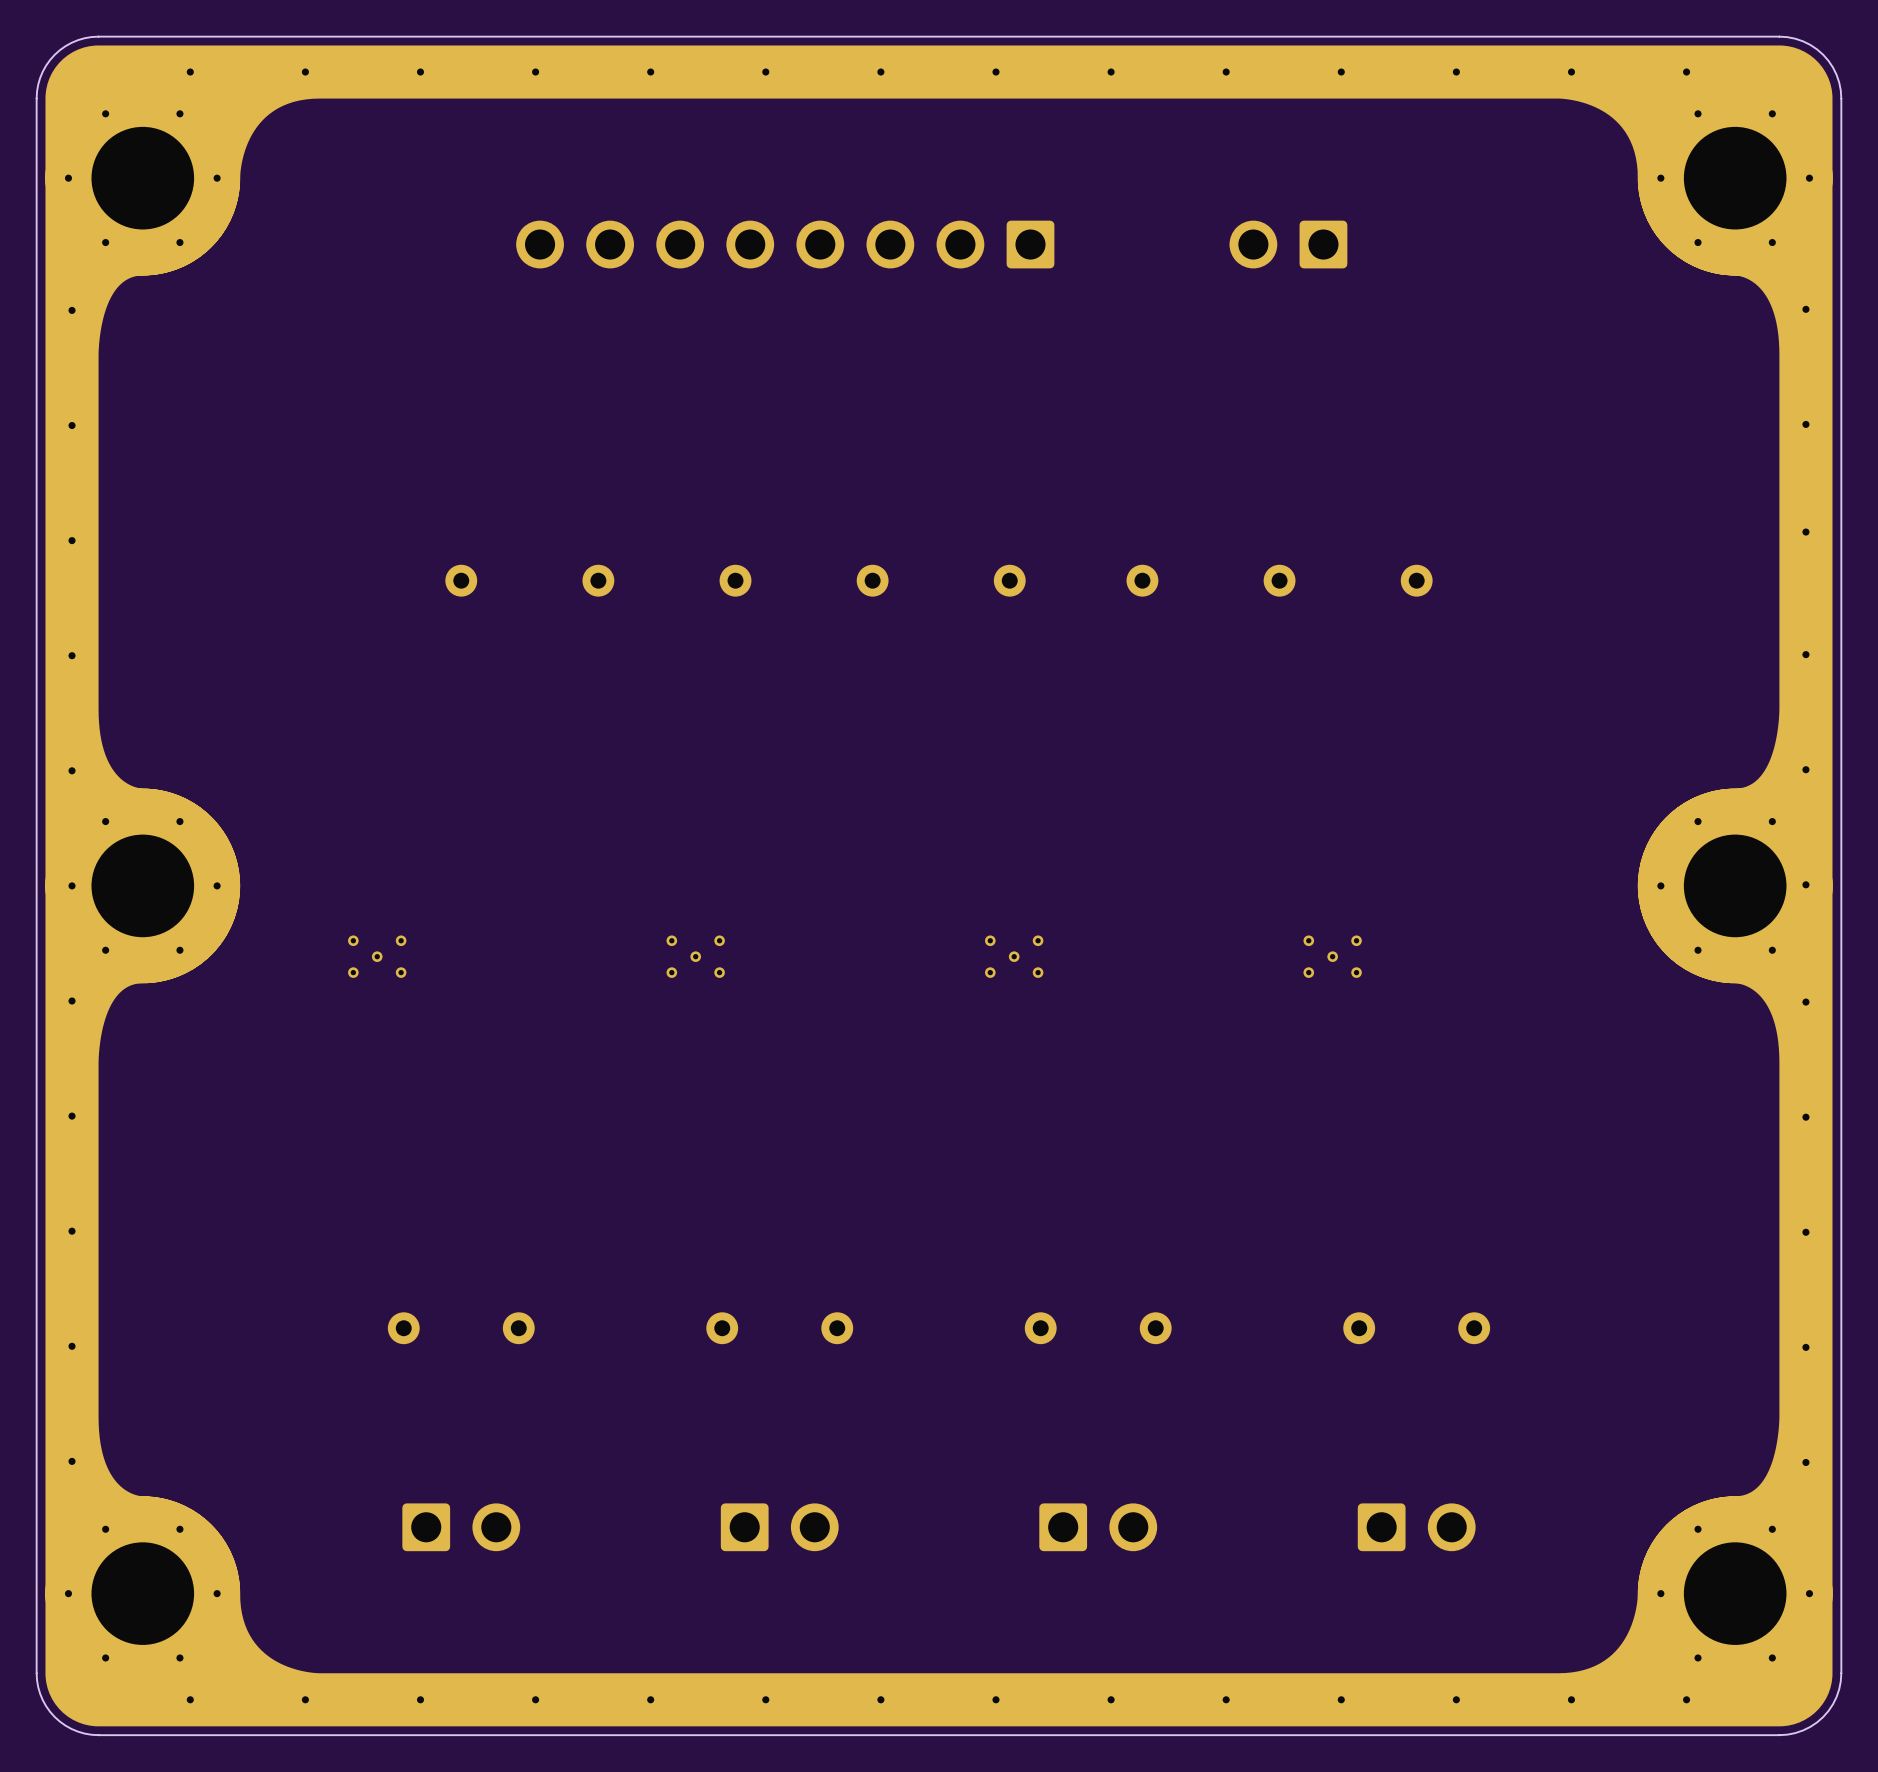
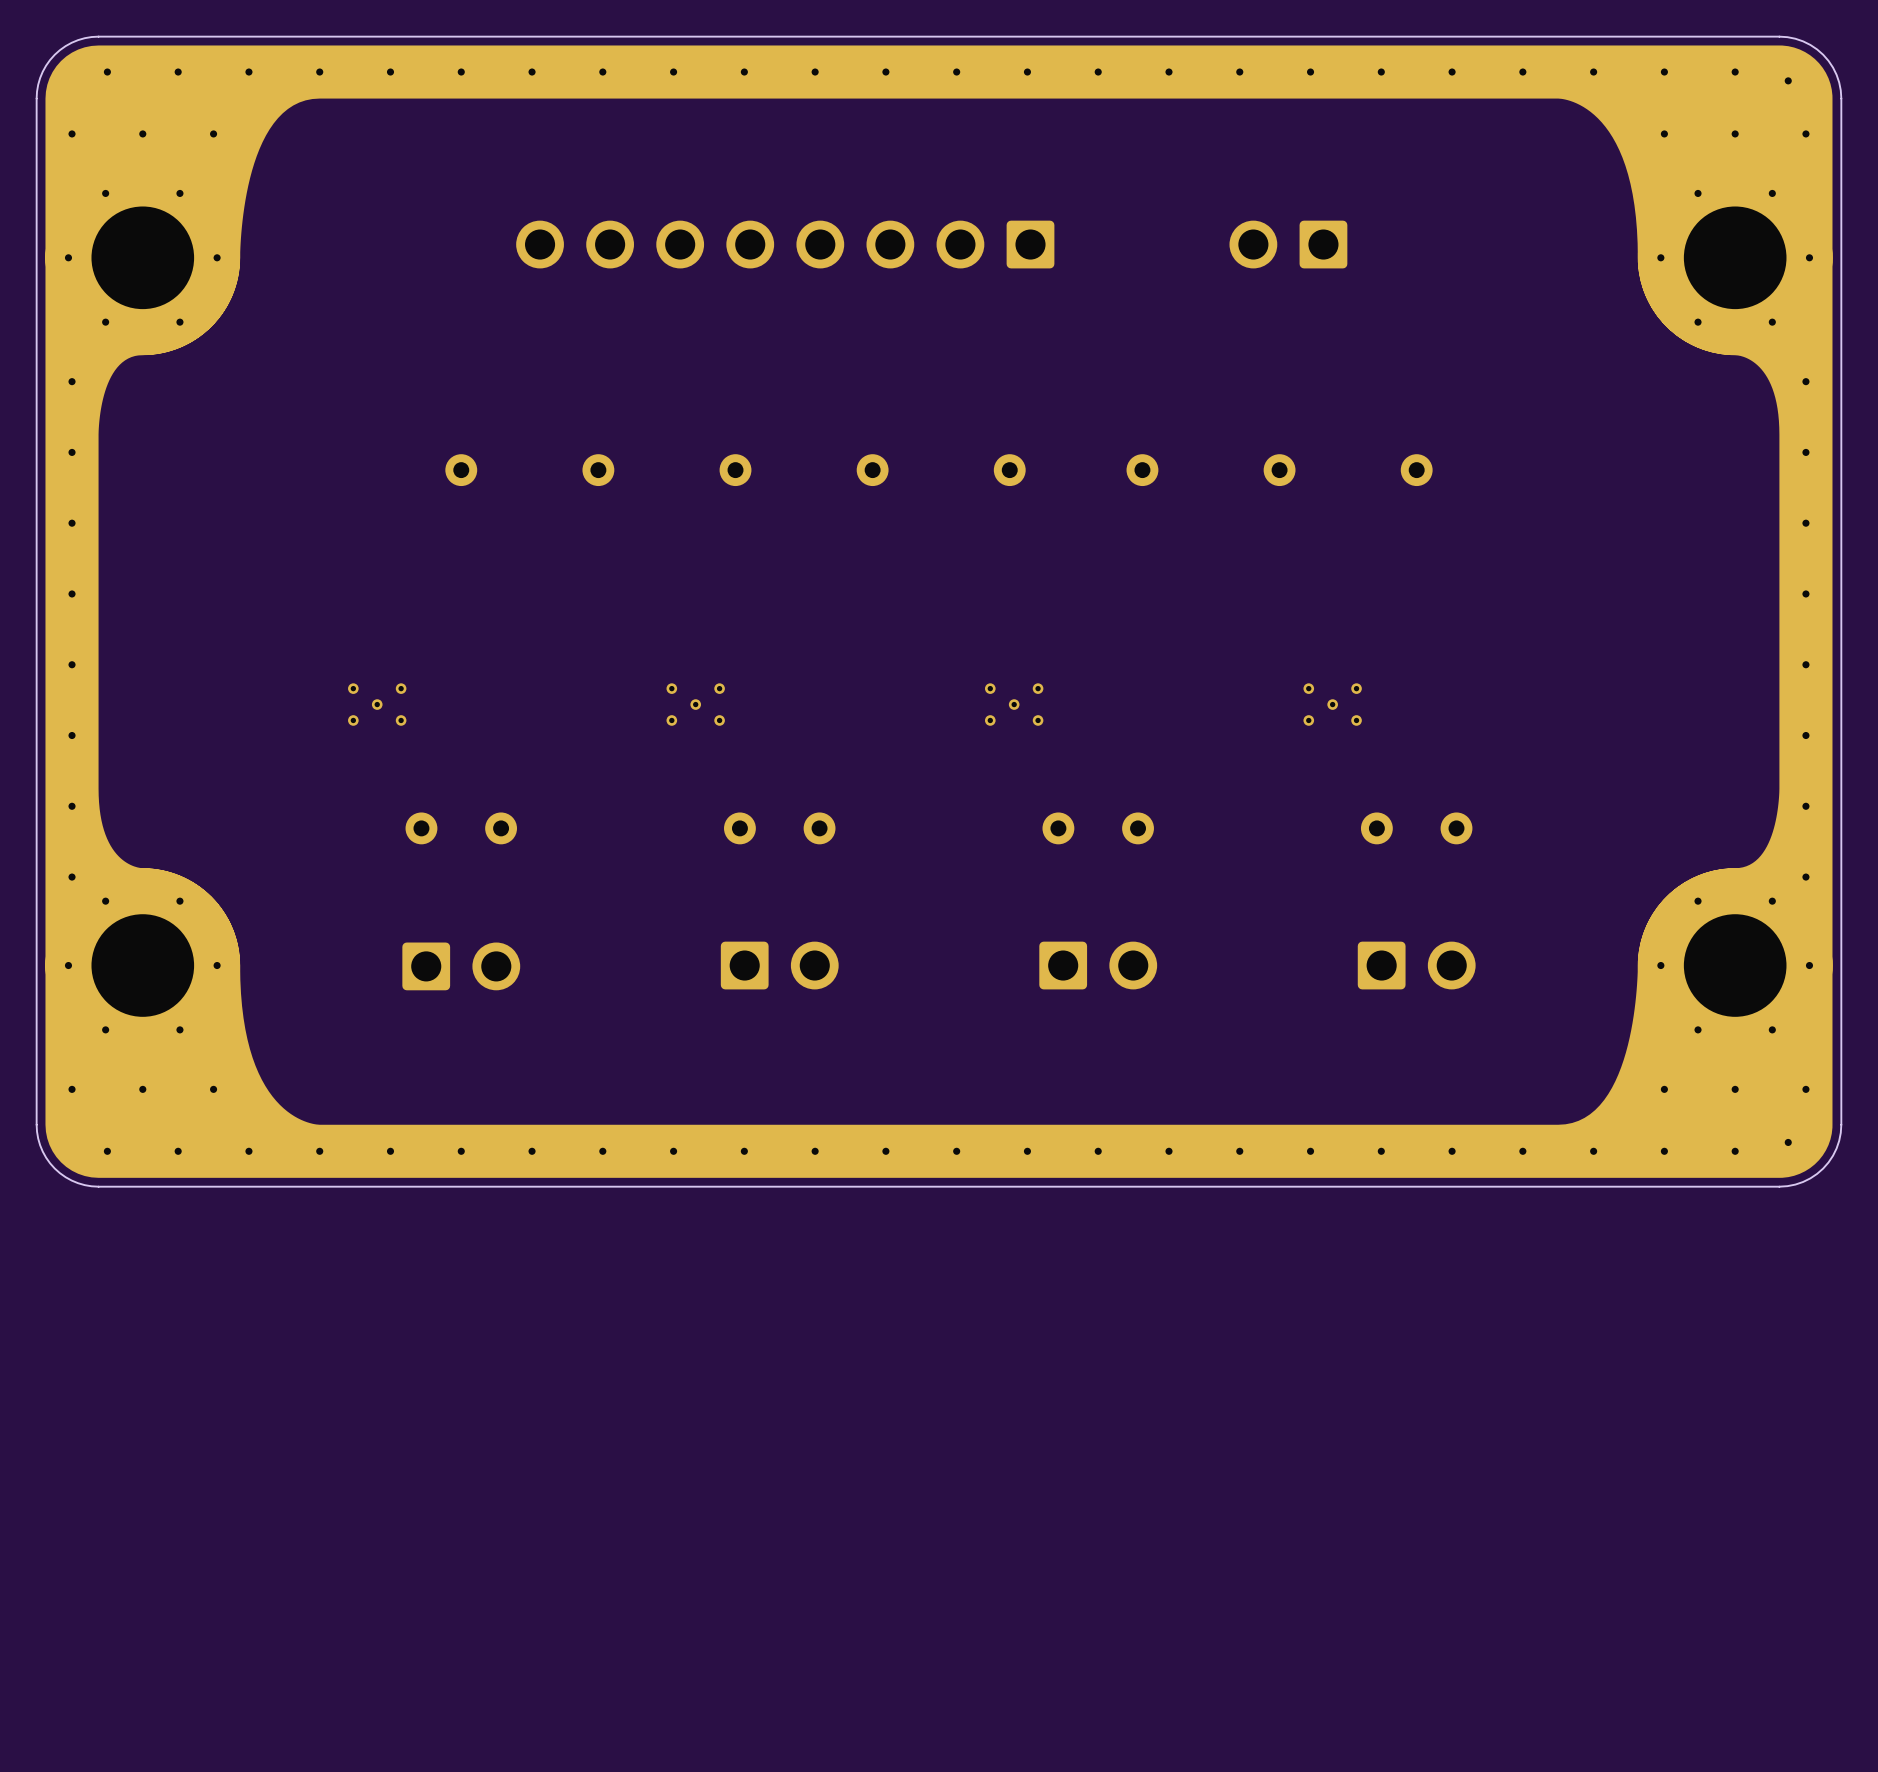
part: none -> (461, 470)
part: none -> (598, 470)
part: none -> (735, 470)
part: none -> (872, 470)
part: none -> (1009, 470)
part: none -> (1142, 470)
part: none -> (1279, 470)
part: none -> (1416, 470)
part: (461, 580) -> none
part: (598, 580) -> none
part: (735, 580) -> none
part: (872, 580) -> none
part: (1009, 580) -> none
part: (1142, 580) -> none
part: (1279, 580) -> none
part: (1416, 580) -> none
part: none -> (938, 611)
part: none -> (377, 704)
part: none -> (695, 704)
part: none -> (1014, 704)
part: none -> (1332, 704)
part: none -> (421, 828)
part: none -> (501, 828)
part: none -> (739, 828)
part: none -> (819, 828)
part: none -> (1058, 828)
part: none -> (1138, 828)
part: none -> (1376, 828)
part: none -> (1456, 828)
part: (938, 885) -> none
part: (377, 956) -> none
part: (695, 956) -> none
part: (1014, 956) -> none
part: (1332, 956) -> none
part: none -> (779, 965)
part: none -> (1098, 965)
part: none -> (1416, 965)
part: none -> (461, 966)
part: (403, 1328) -> none
part: (518, 1328) -> none
part: (722, 1328) -> none
part: (837, 1328) -> none
part: (1040, 1328) -> none
part: (1155, 1328) -> none
part: (1359, 1328) -> none
part: (1474, 1328) -> none
part: (461, 1527) -> none
part: (779, 1527) -> none
part: (1098, 1527) -> none
part: (1416, 1527) -> none

